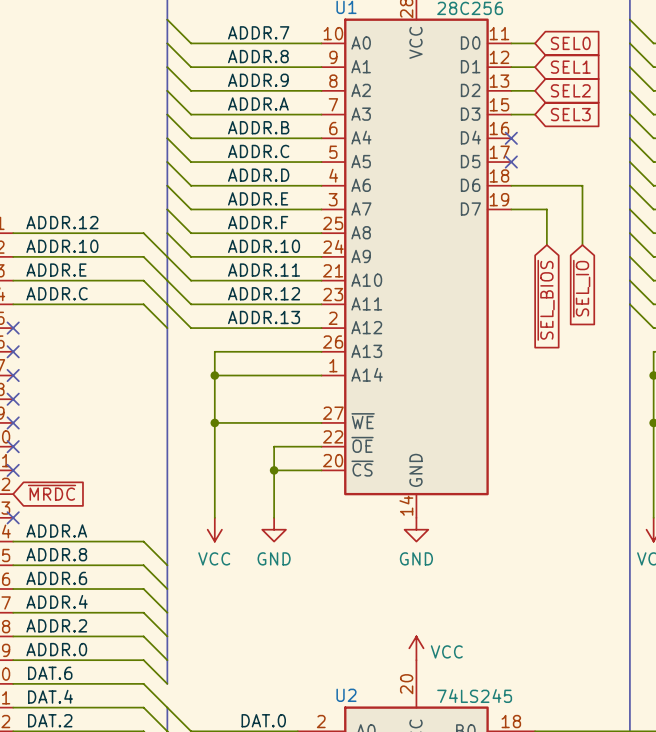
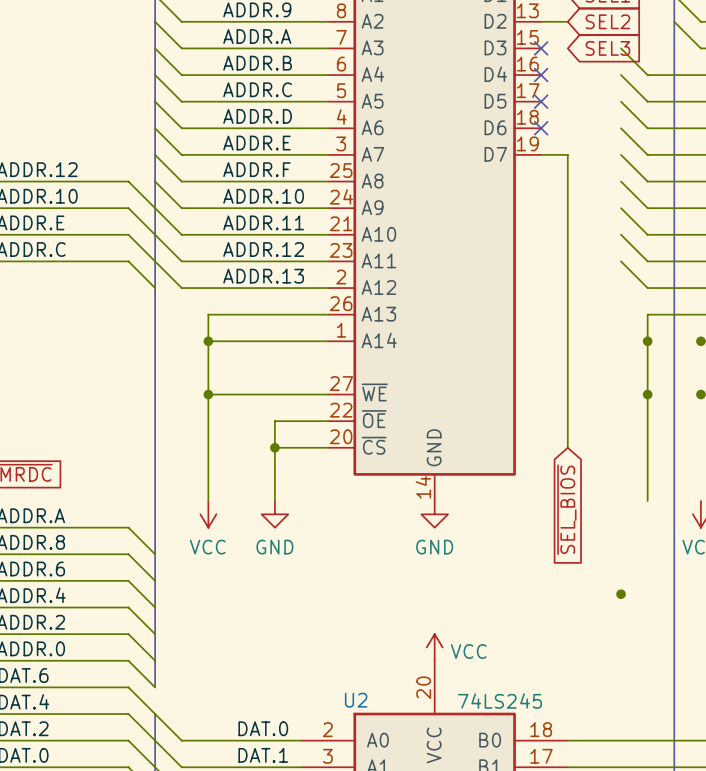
wire: (511, 114) (535, 114) -> none
no-connect mark: none -> (541, 48)
wire: (629, 114) (653, 138) -> (621, 48) (647, 75) (700, 75)
wire: (629, 138) (653, 162) -> (621, 75) (647, 101) (700, 101)
wire: (629, 162) (653, 185) -> (621, 101) (647, 128) (700, 128)
wire: (511, 185) (582, 185) (582, 245) -> none
no-connect mark: none -> (541, 128)
wire: (629, 185) (653, 209) -> (621, 128) (647, 154) (700, 154)
wire: (535, 209) (546, 209) (546, 245) -> (567, 154) (567, 447)
wire: (629, 209) (653, 233) -> (621, 154) (647, 181) (700, 181)
wire: (629, 233) (653, 256) -> (621, 181) (647, 208) (700, 208)
wire: (629, 256) (653, 280) -> (621, 208) (647, 234) (700, 234)
wire: (629, 280) (653, 304) -> (621, 234) (647, 261) (700, 261)
global label: ~{SEL_IO} (581, 288) -> none
global label position: ~{SEL_BIOS} (546, 300) -> ~{SEL_BIOS} (566, 509)
wire: (629, 304) (653, 328) -> (621, 261) (647, 288) (700, 288)
wire: (653, 351) (653, 517) -> (700, 314) (647, 314) (647, 501)
junction: none -> (647, 341)
junction: none -> (647, 394)
junction: none -> (621, 594)

